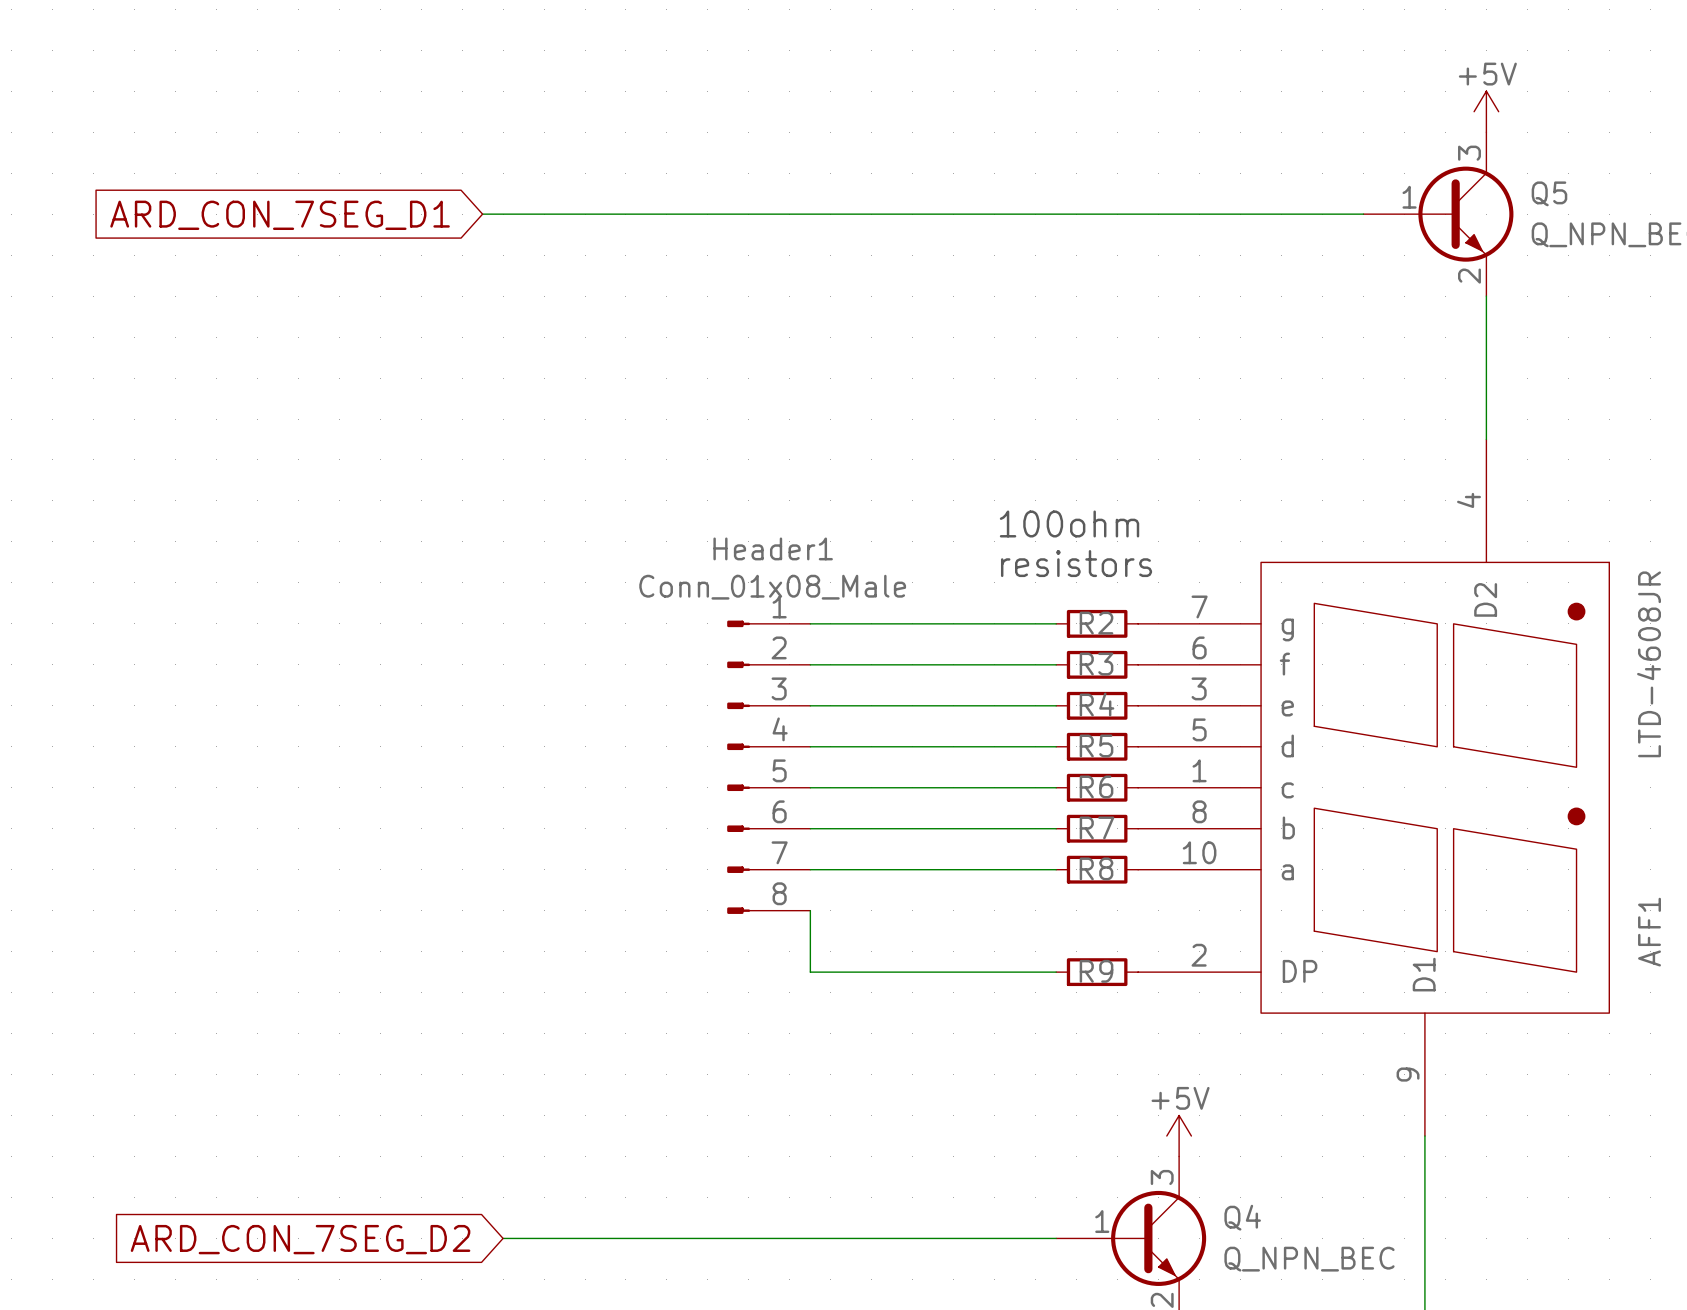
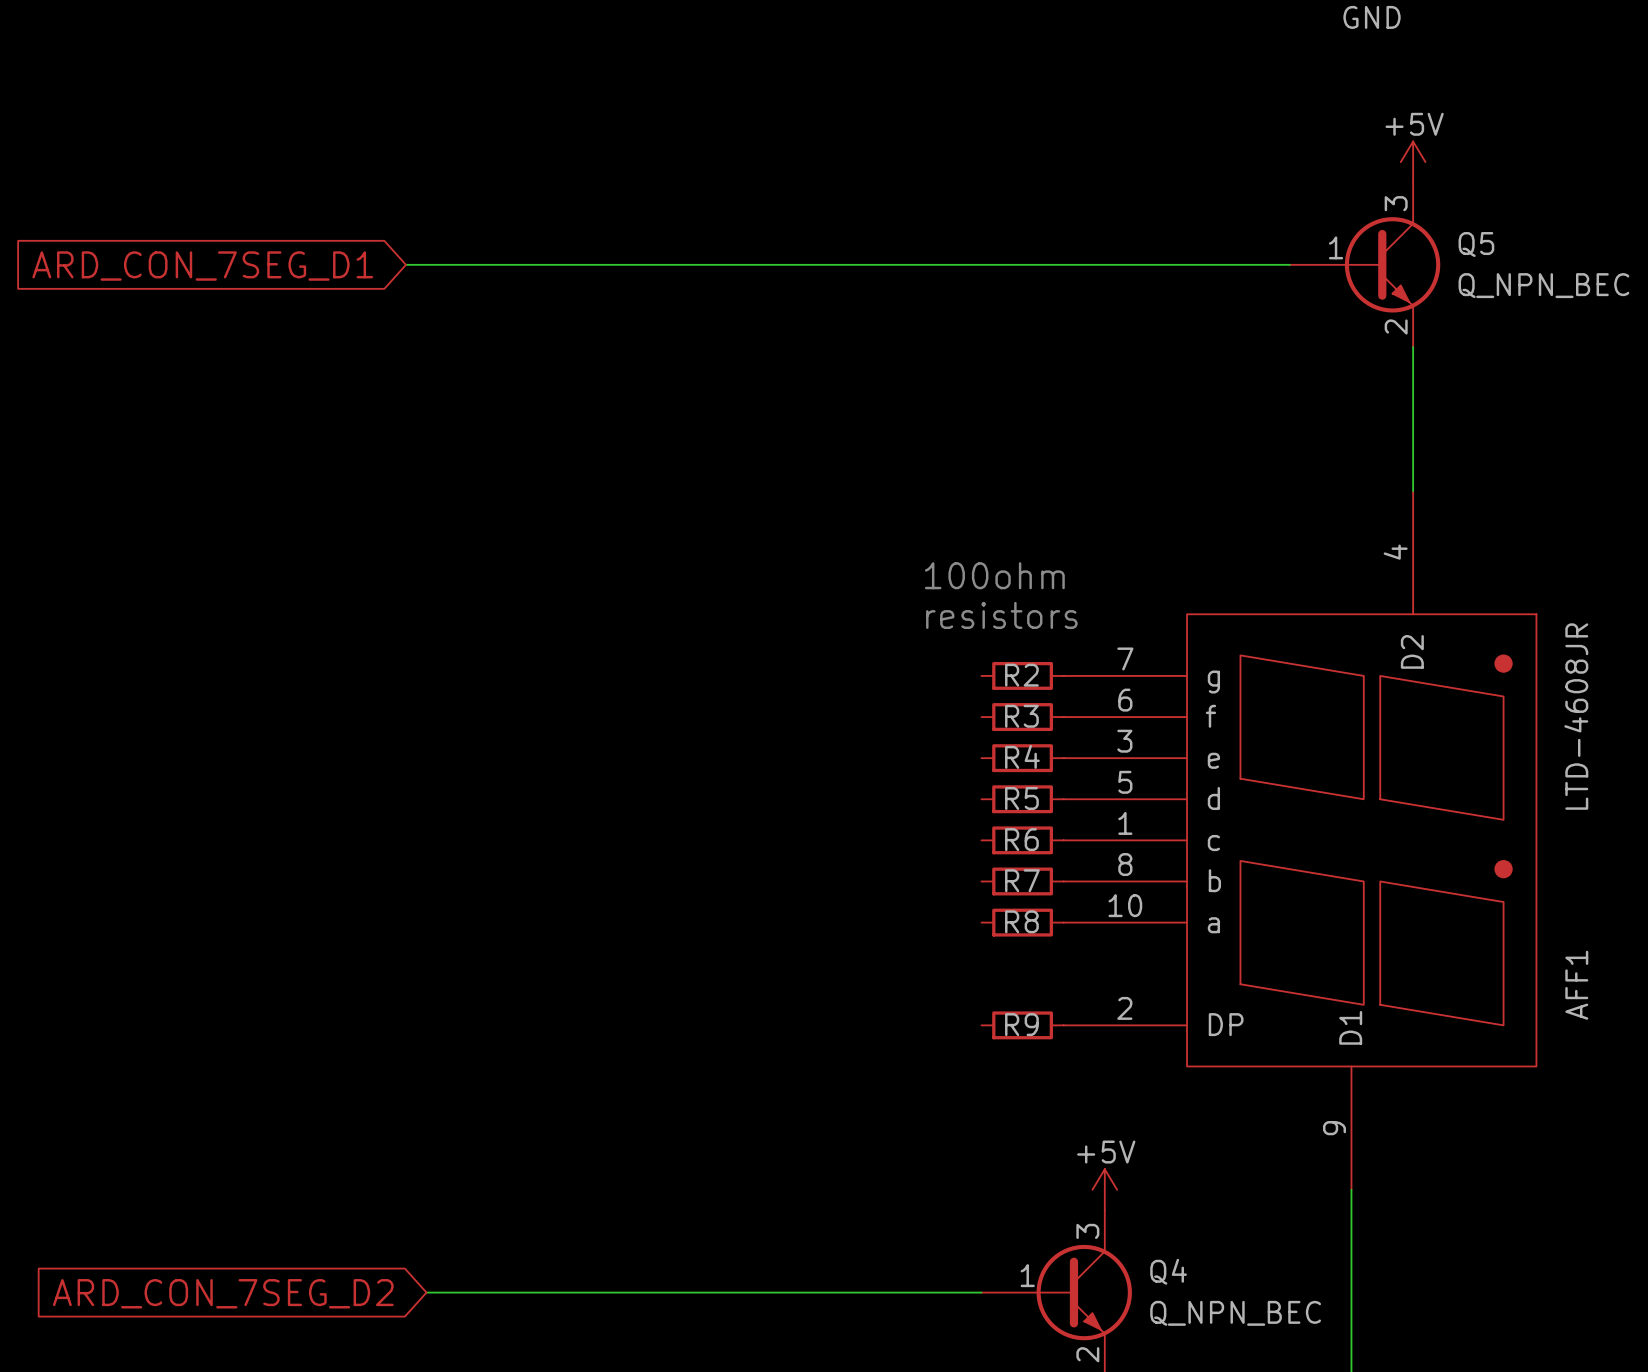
wire: (810, 623) (1056, 623) -> none
wire: (810, 664) (1056, 664) -> none
wire: (810, 705) (1056, 705) -> none
wire: (810, 746) (1056, 746) -> none
Header1: Conn_01x08_Male (768, 767) -> none
wire: (810, 787) (1056, 787) -> none
wire: (810, 828) (1056, 828) -> none
wire: (810, 869) (1056, 869) -> none
wire: (810, 910) (810, 972) (1056, 972) -> none

